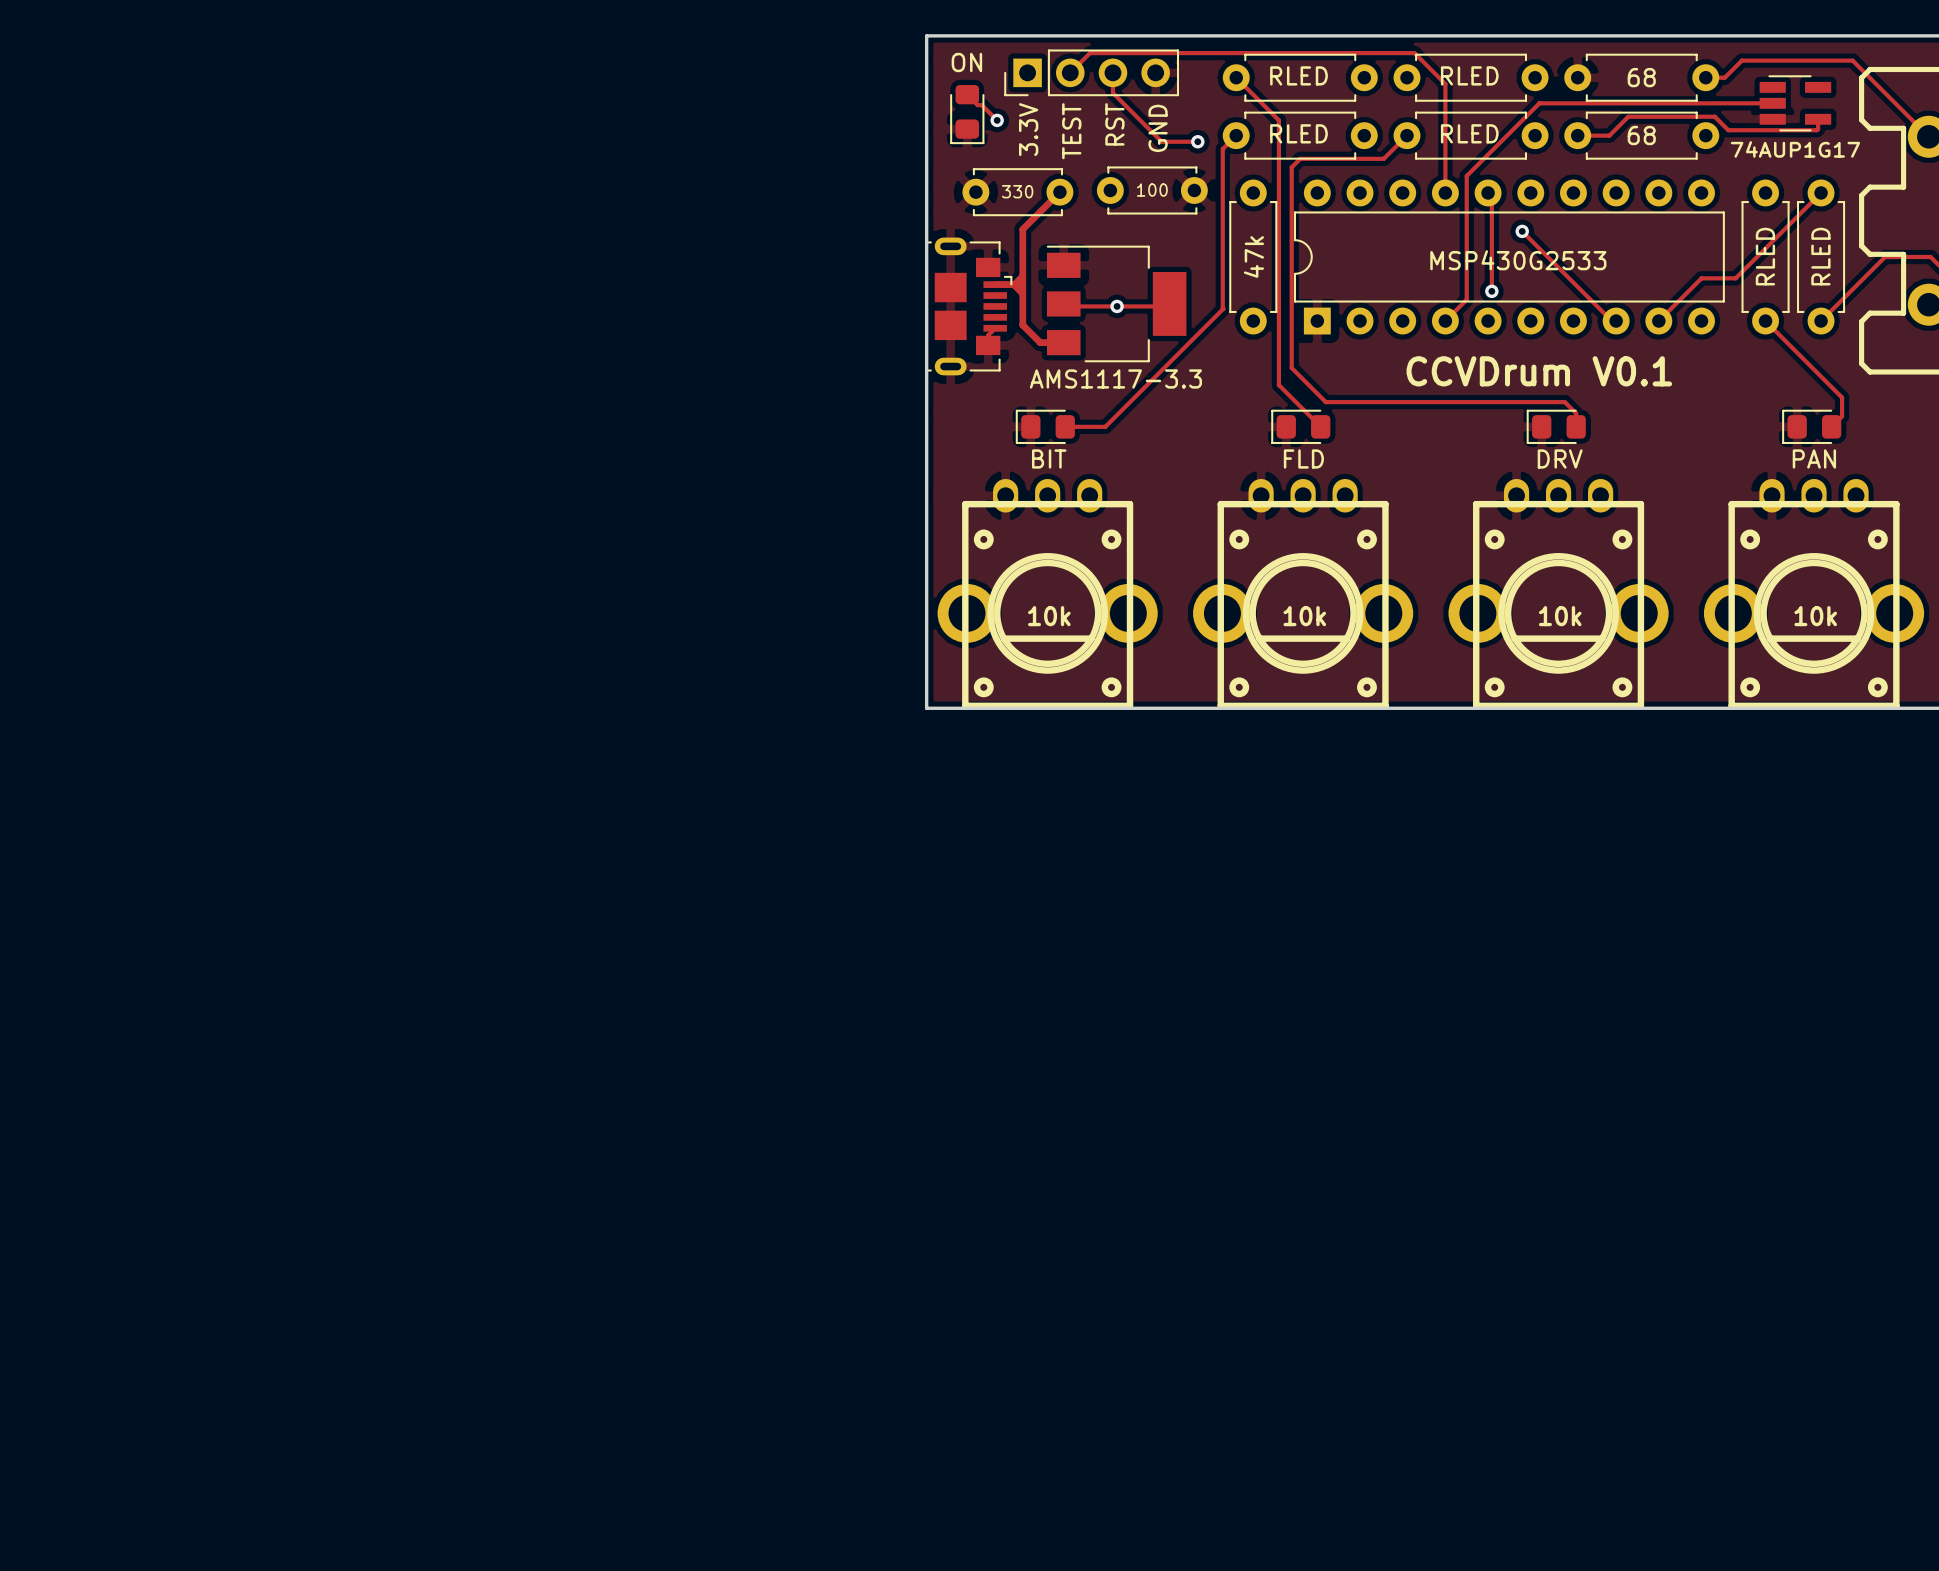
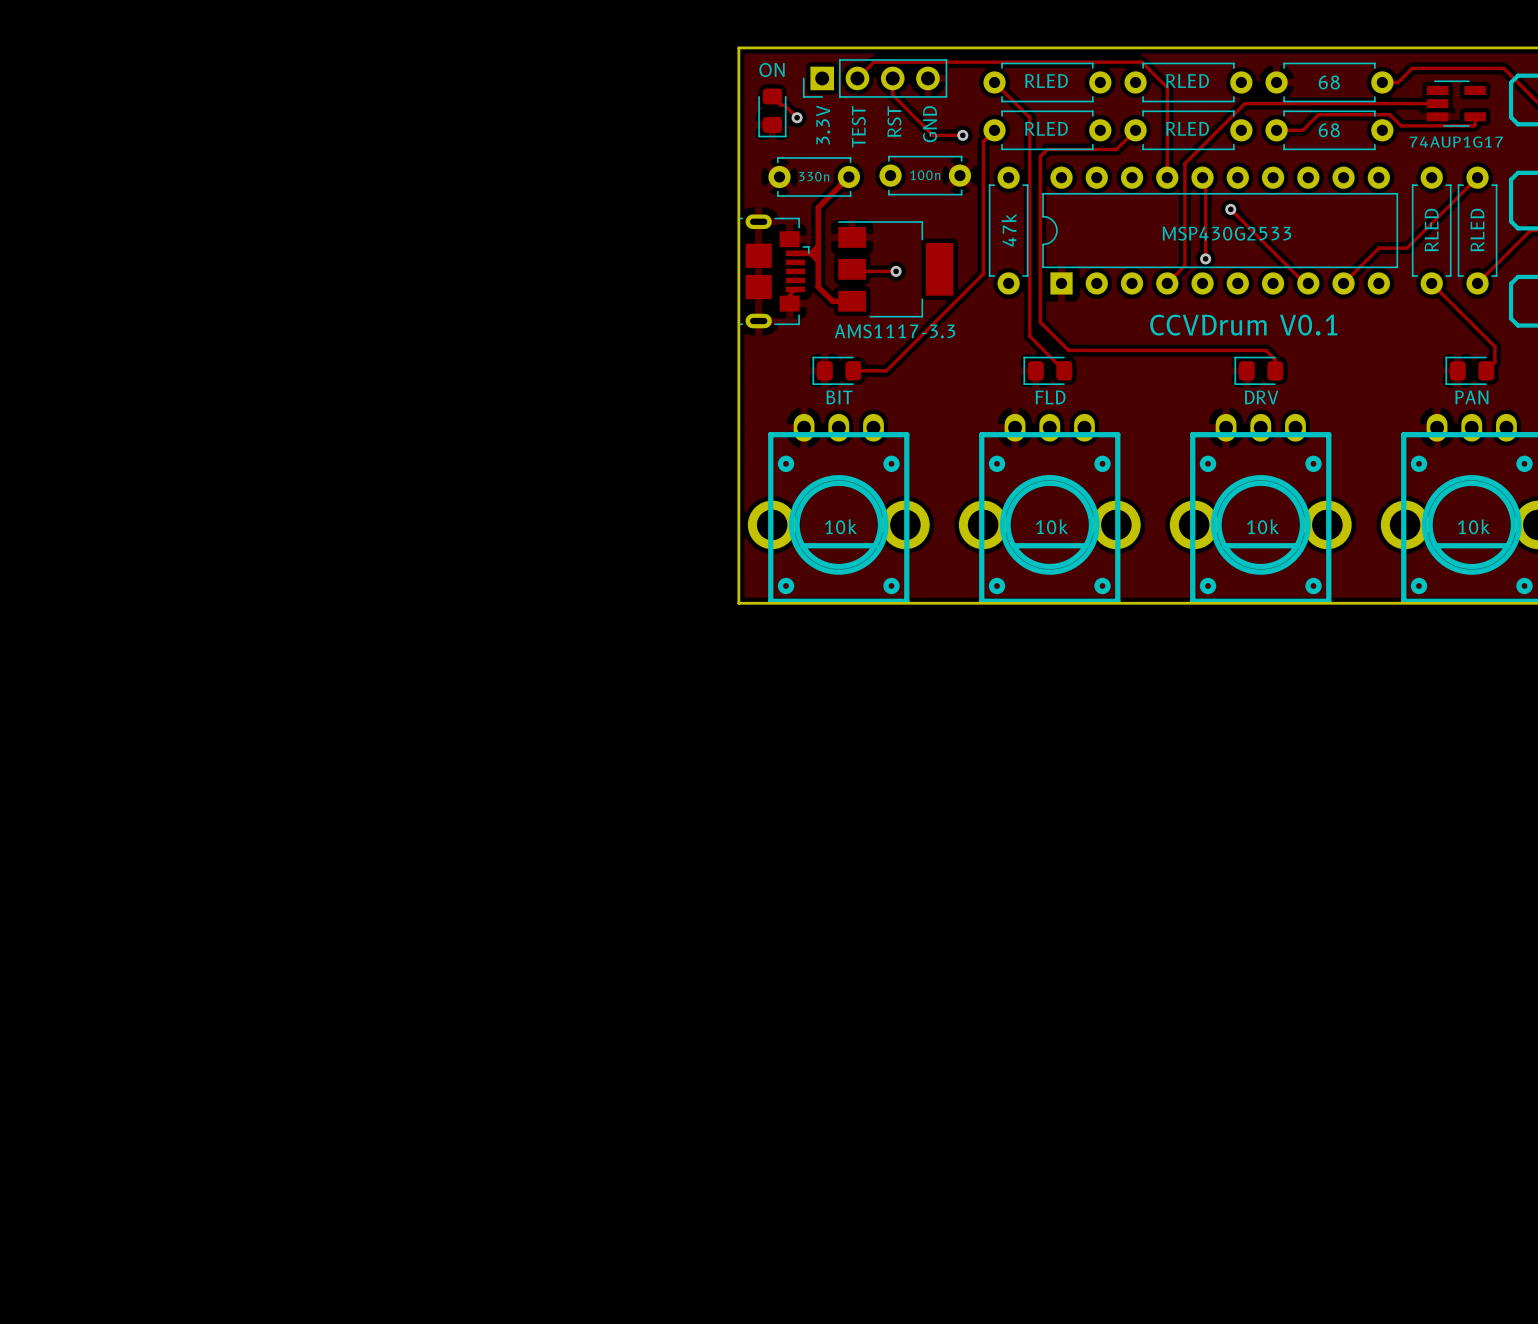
part value: 100 (1152, 190) -> 100n (925, 175)
part value: 330 (1017, 191) -> 330n (814, 176)
track: (1117, 306) (1167, 306) -> none

